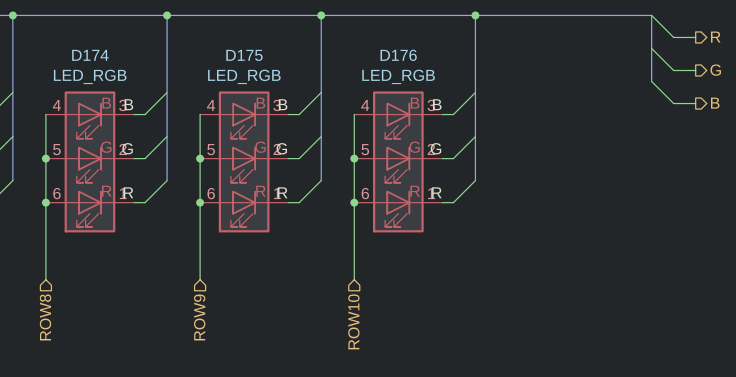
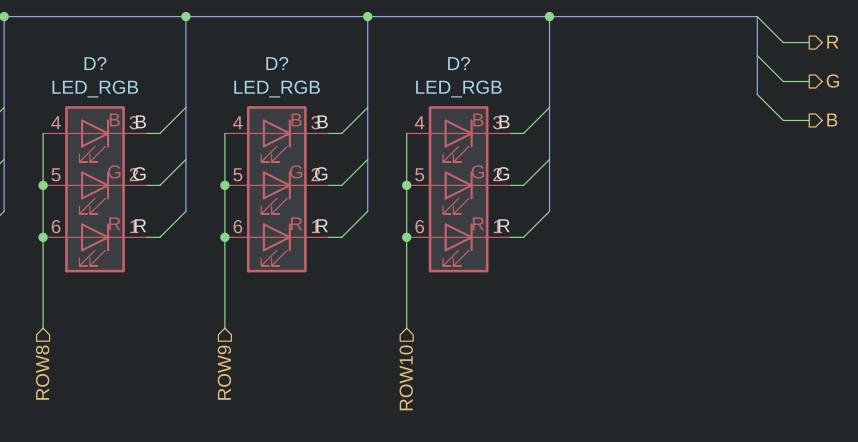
D174 name: D174 (90, 55) -> D? (95, 63)
D175 name: D175 (244, 55) -> D? (277, 63)
D176 name: D176 (398, 55) -> D? (459, 63)

